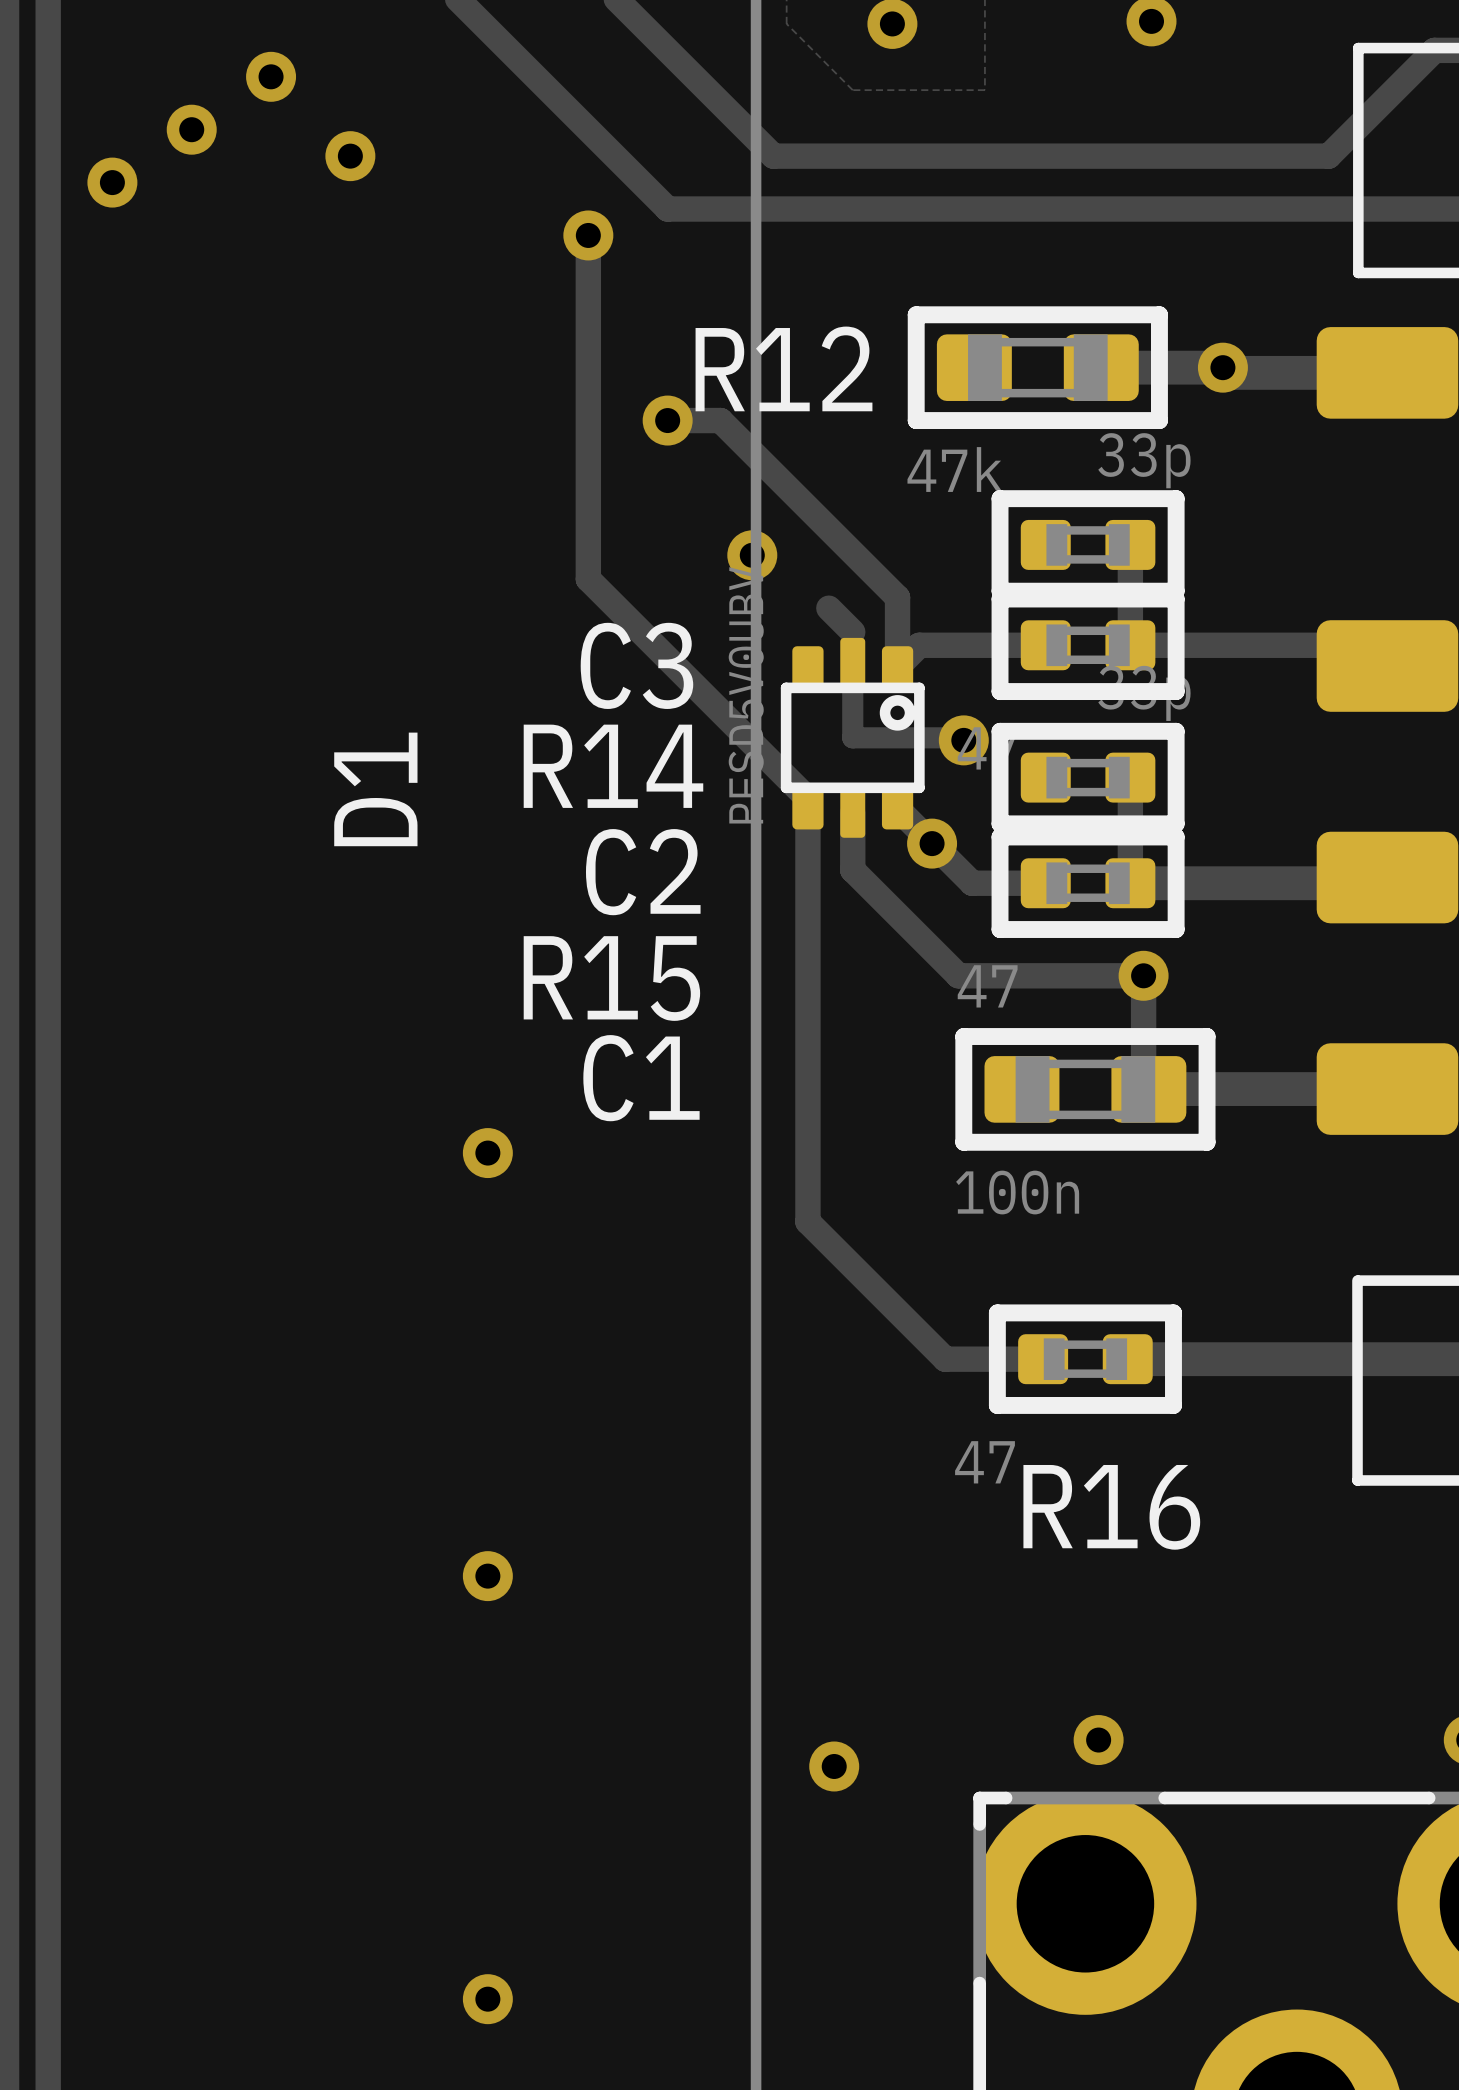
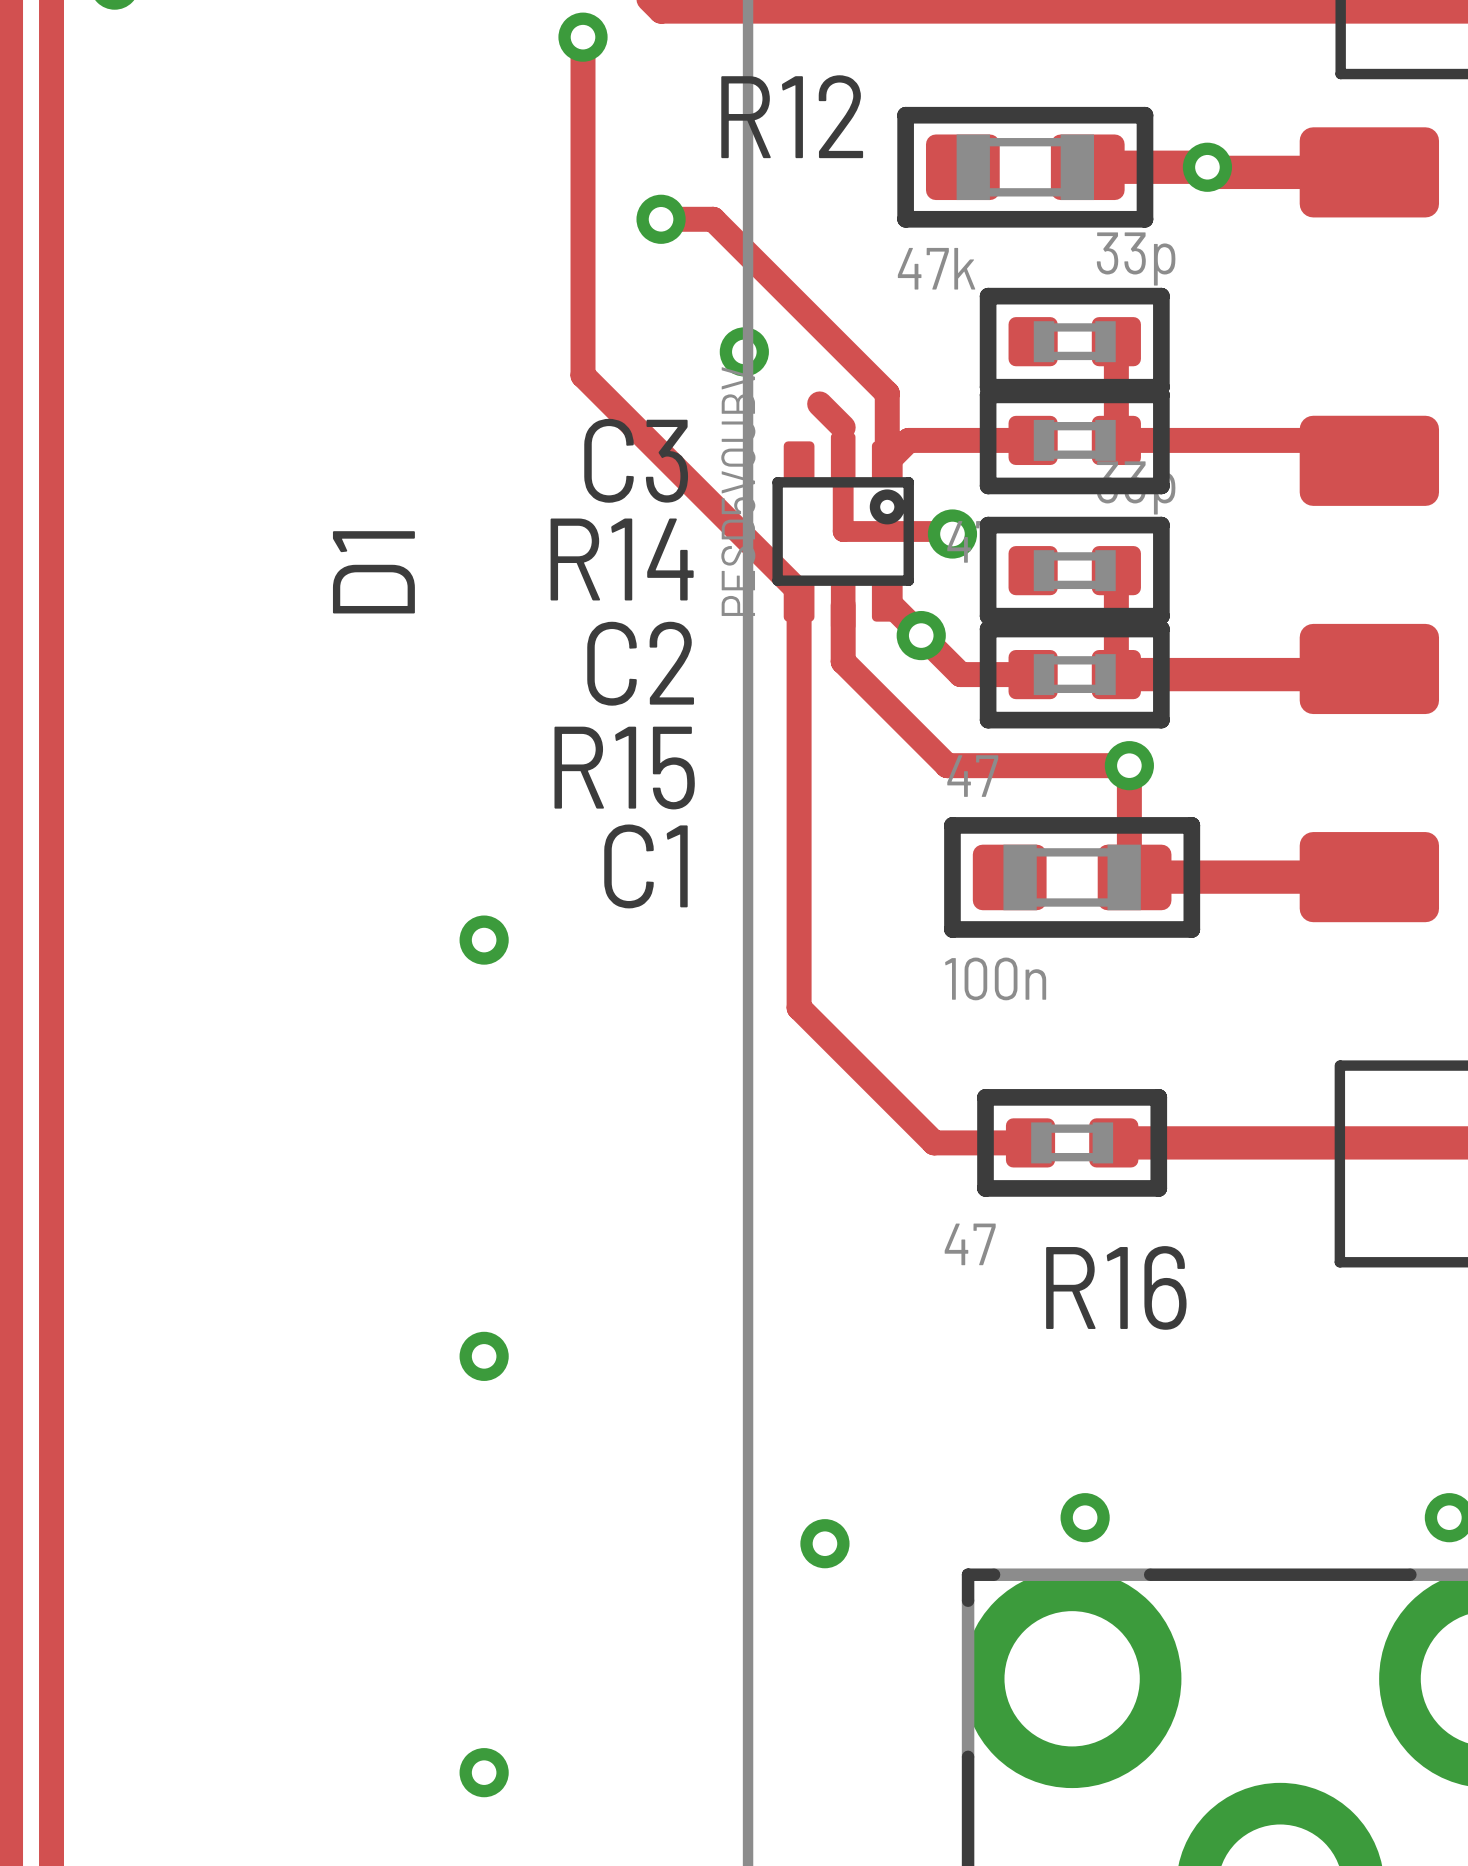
R12 name position: R12 (783, 368) -> R12 (792, 116)

